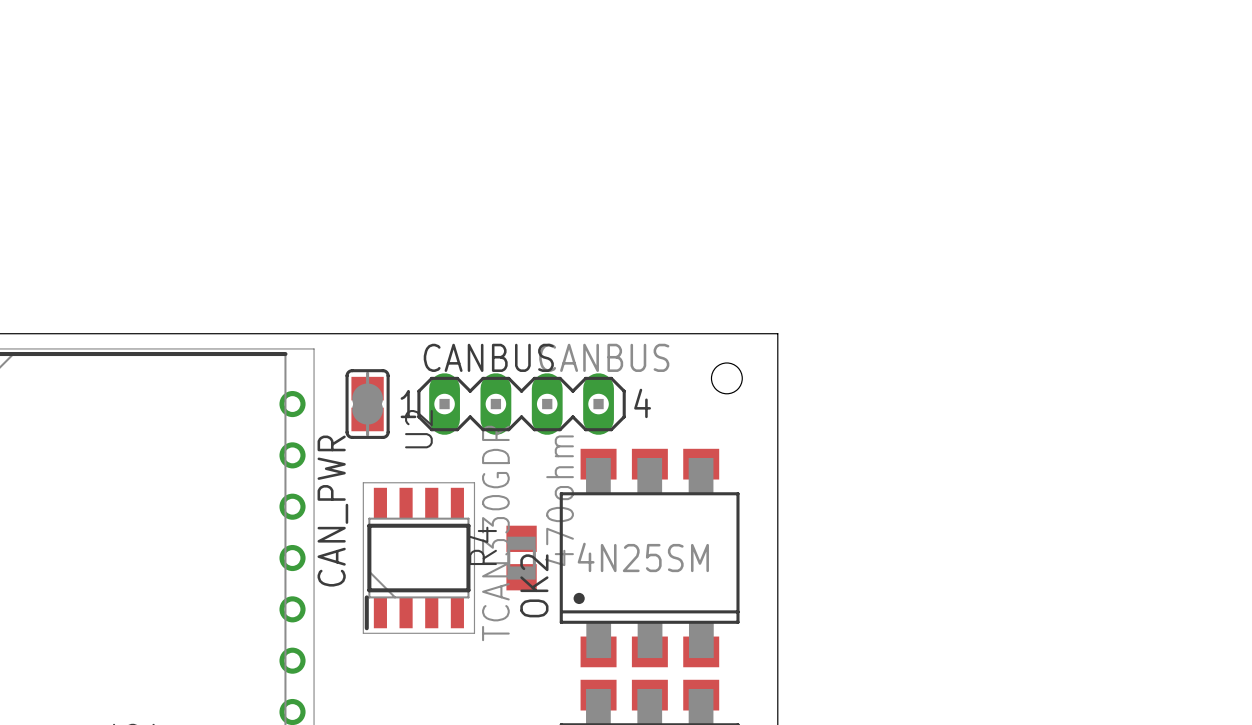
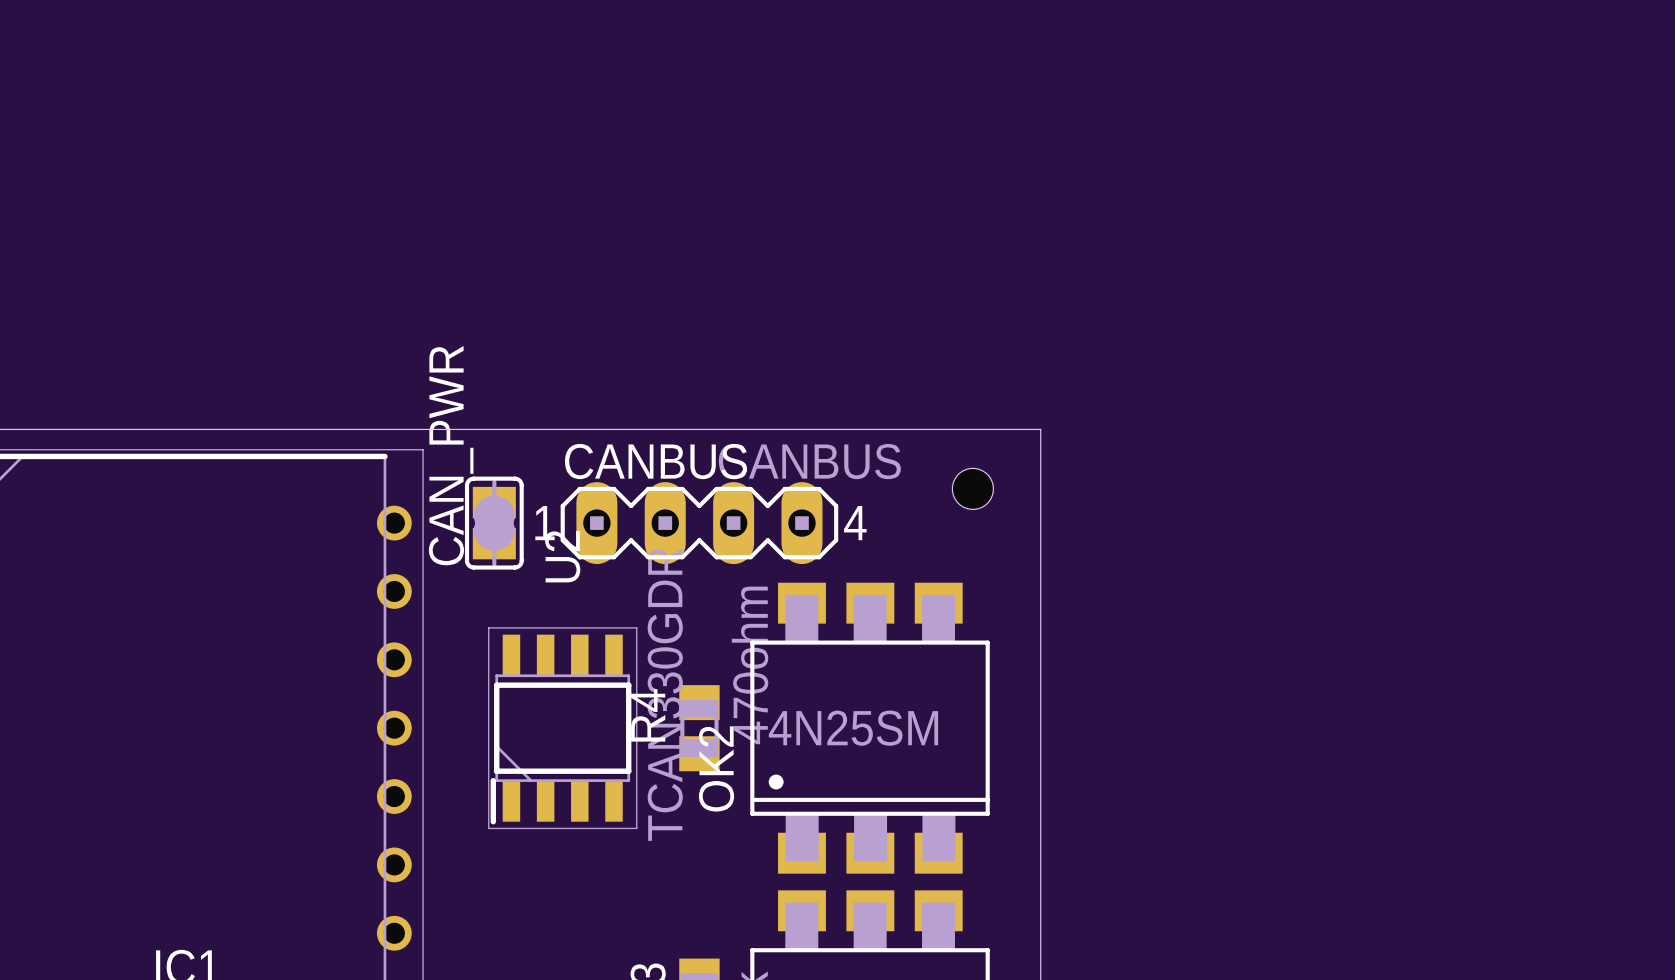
CAN_PWR name position: CAN_PWR (332, 511) -> CAN_PWR (451, 455)

